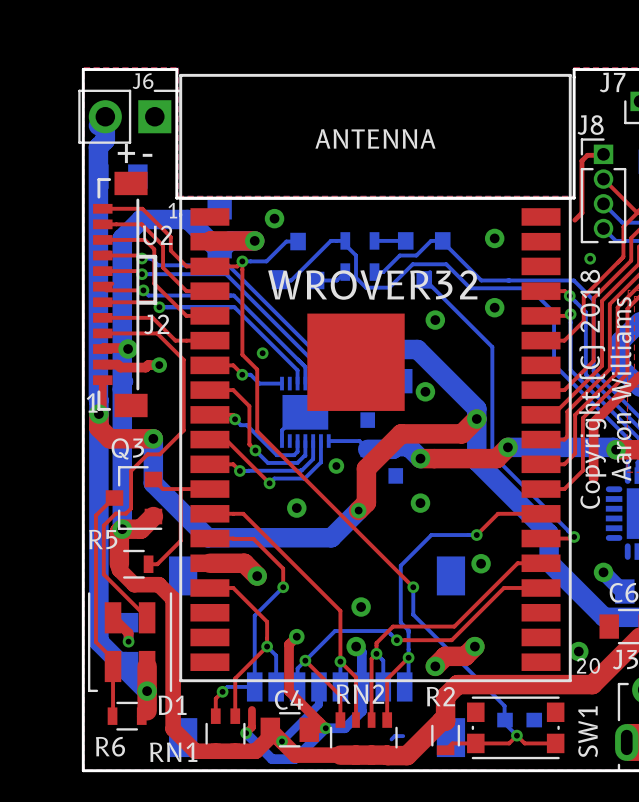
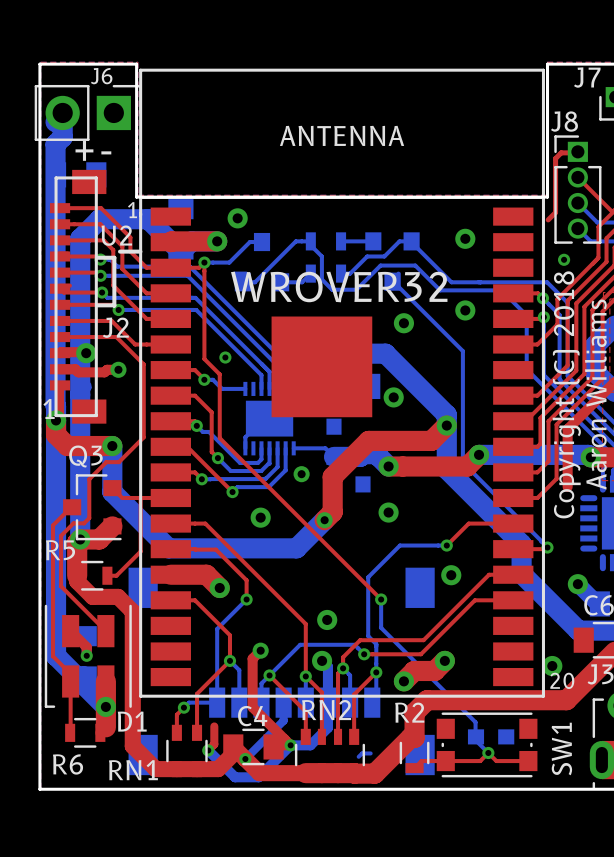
J2 footprint: [93, 171, 148, 418] -> [49, 169, 107, 424]
line: none -> (119, 251) (140, 251)

